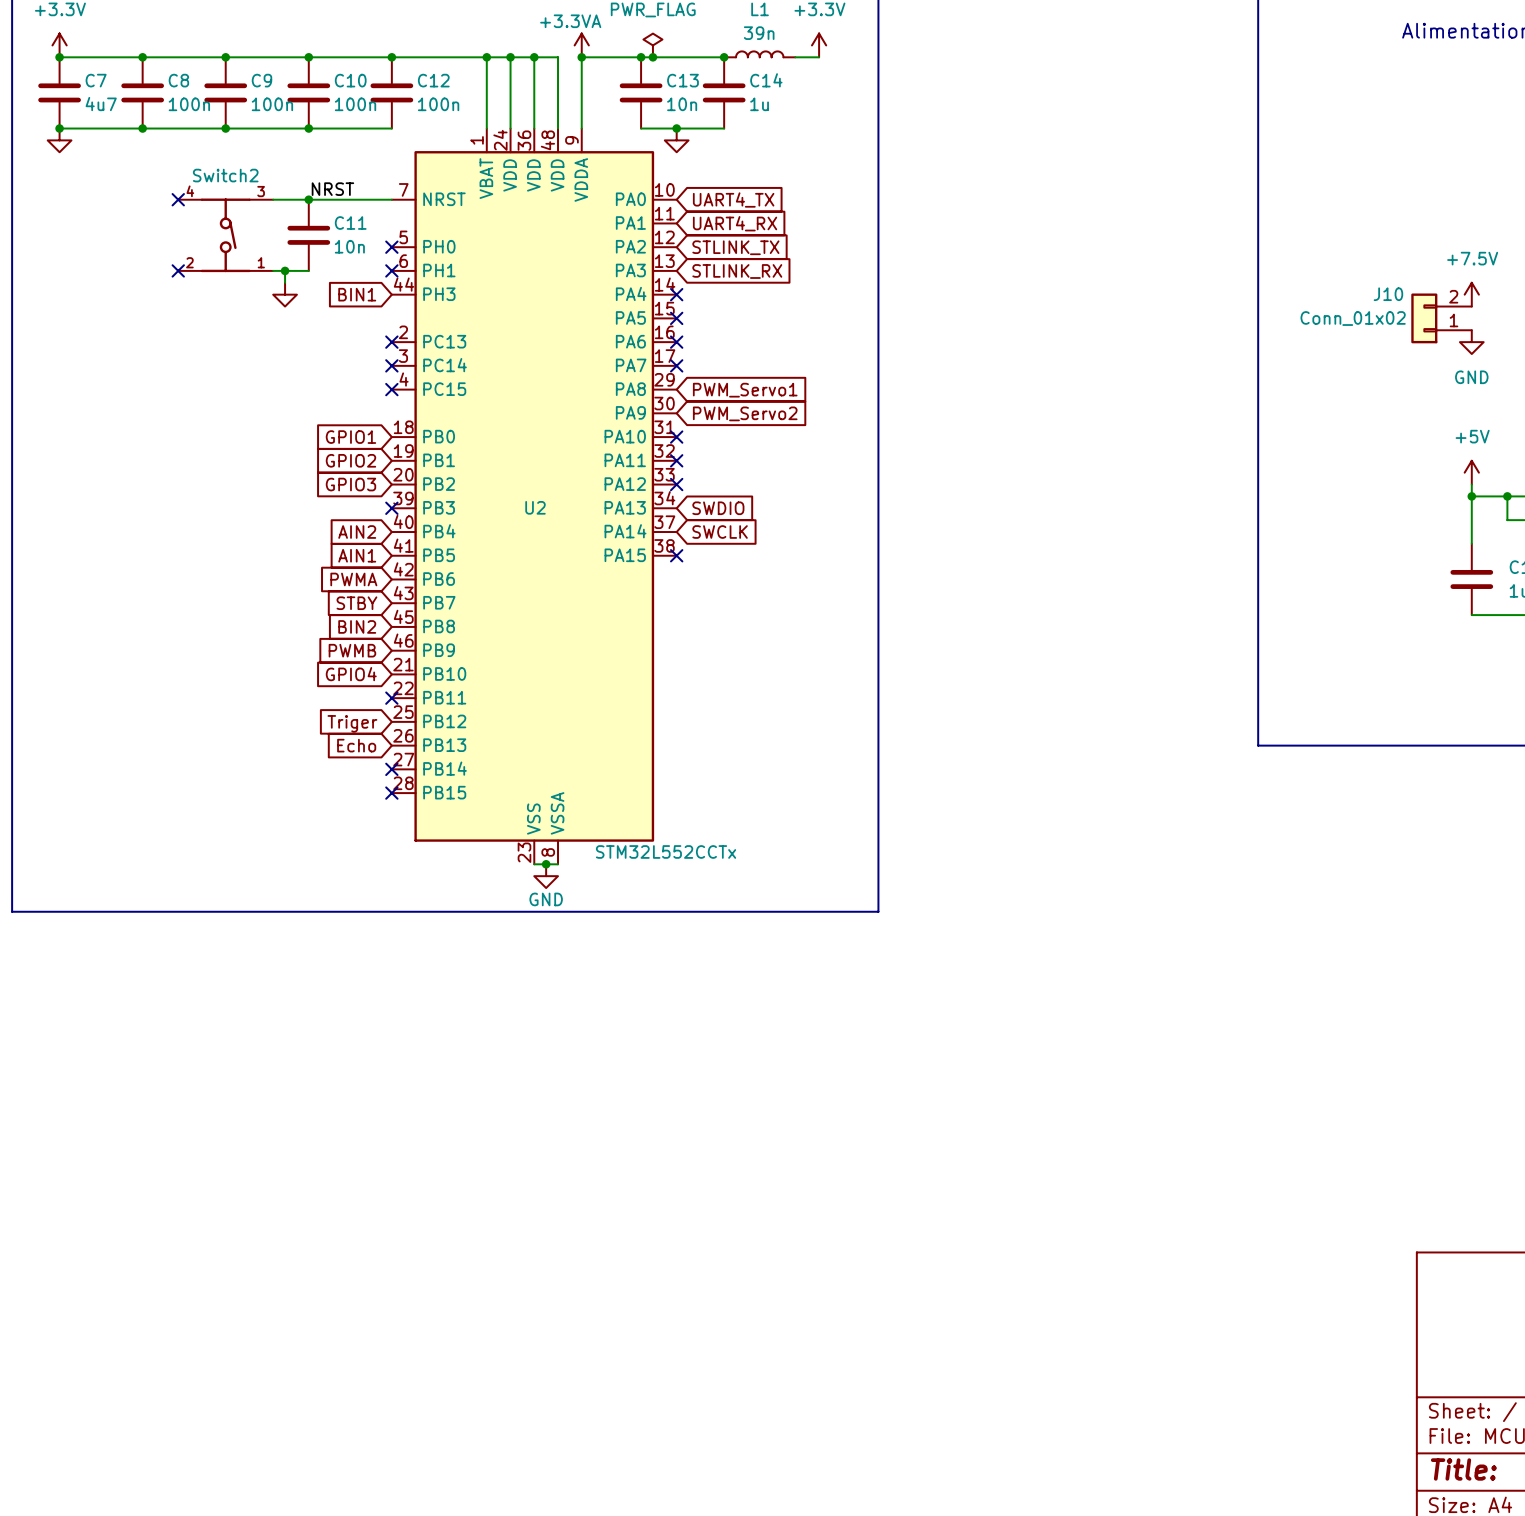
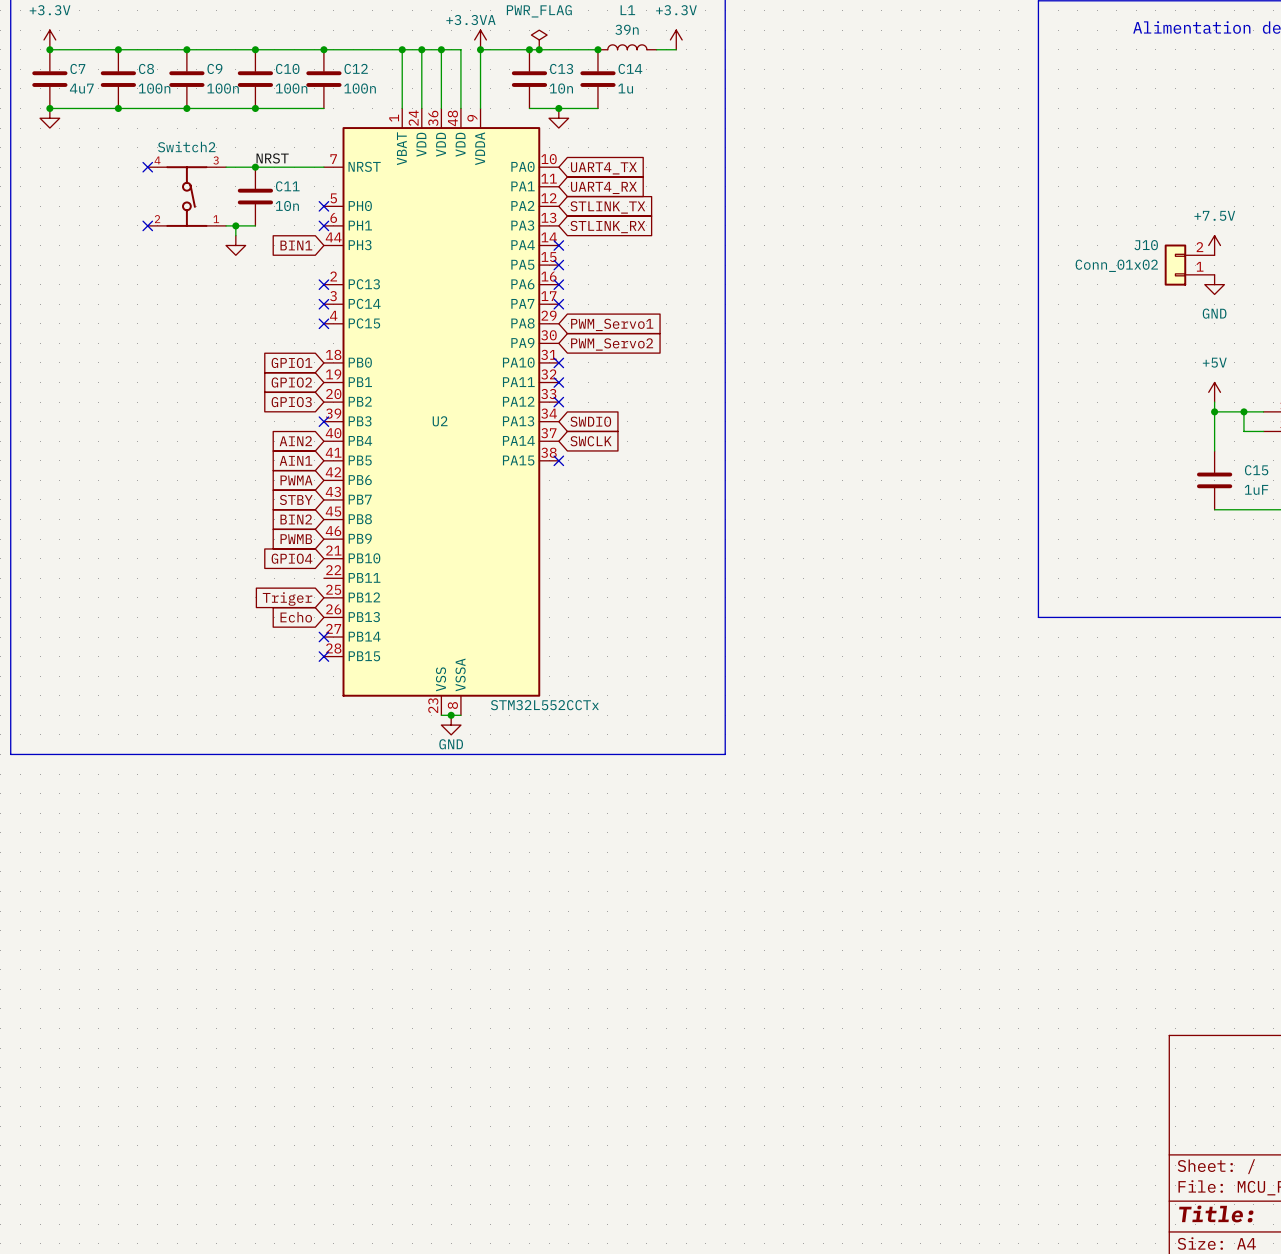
no-connect mark: (391, 698) -> none

